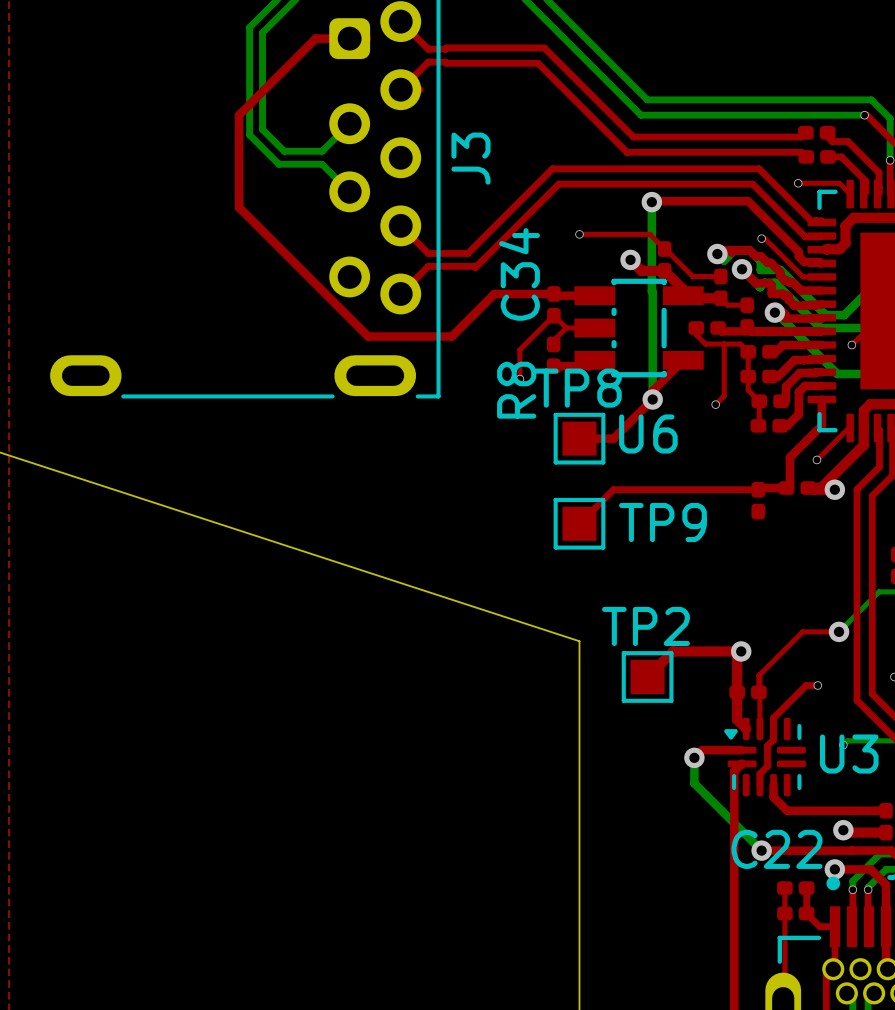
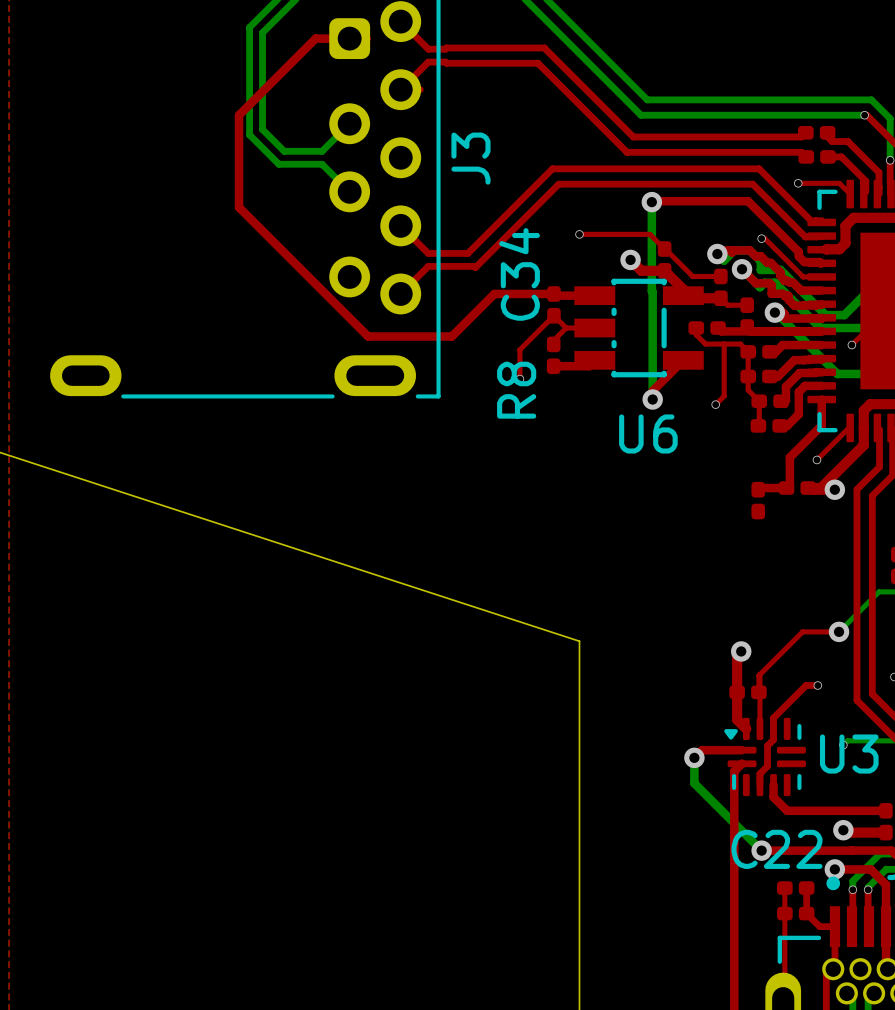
top track: (652, 399) (613, 438) (579, 438) -> none
TP8: (579, 438) -> none
top track: (758, 489) (613, 489) (579, 523) -> none
TP9: (579, 523) -> none
top track: (741, 651) (673, 651) (647, 676) -> none
TP2: (647, 676) -> none

